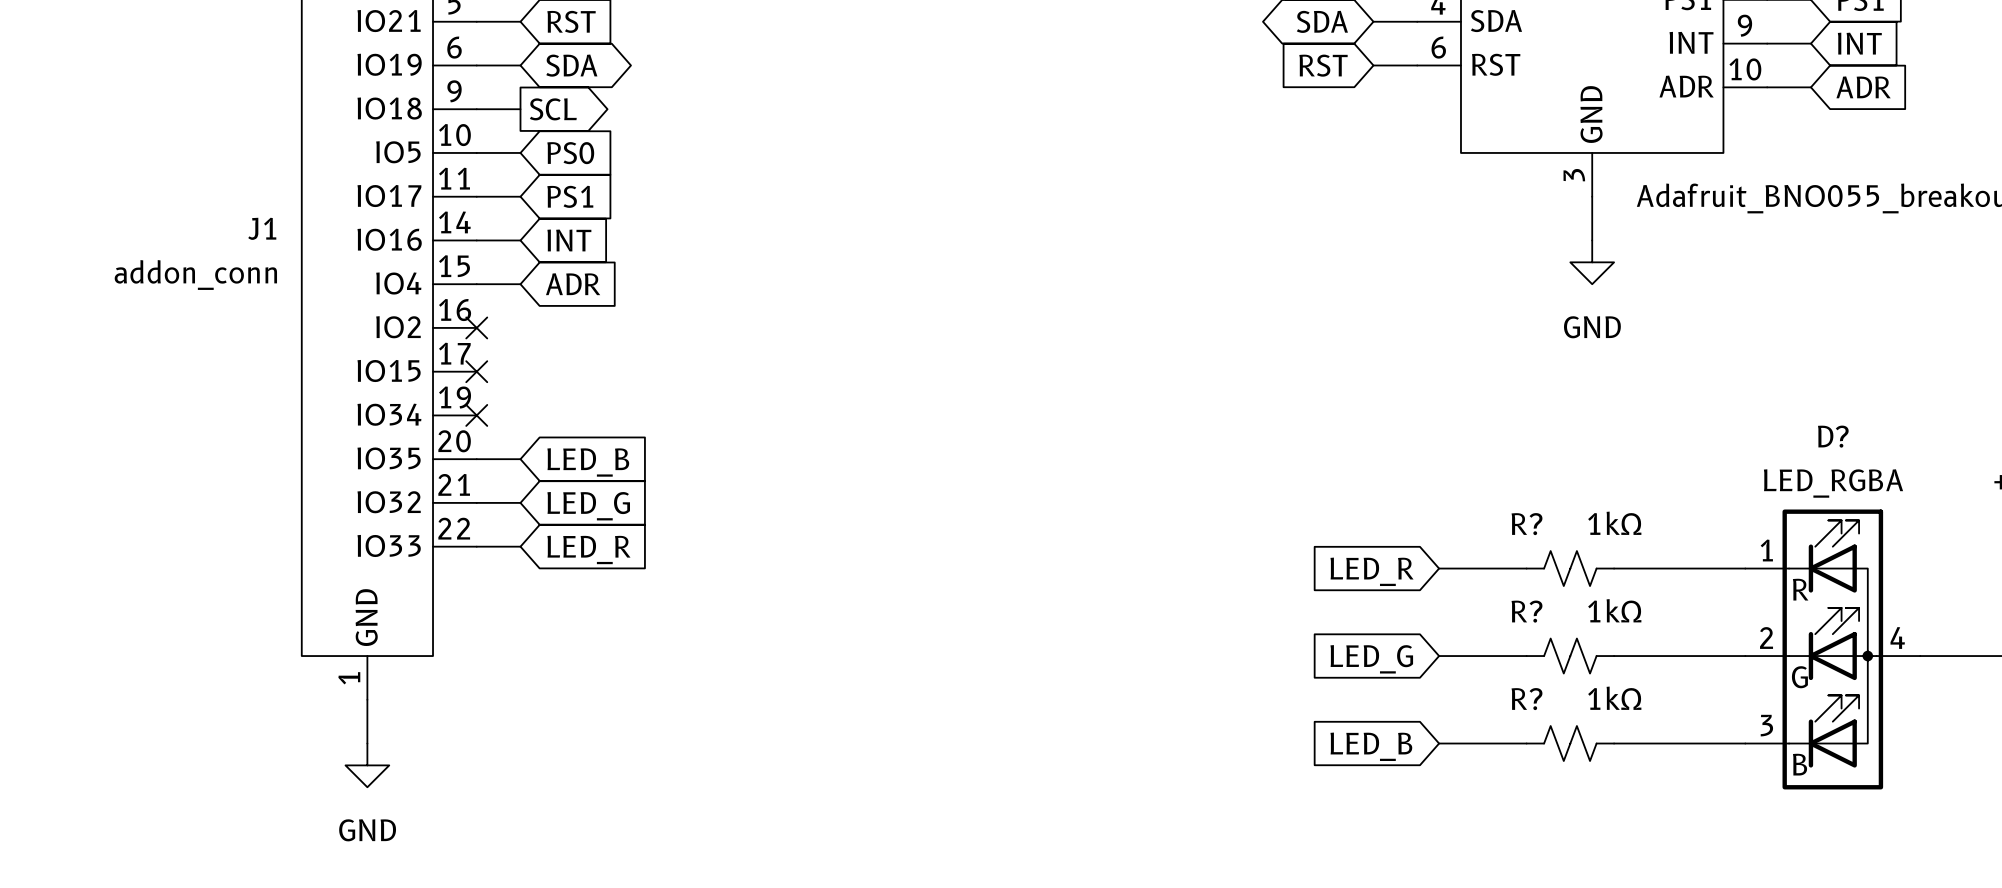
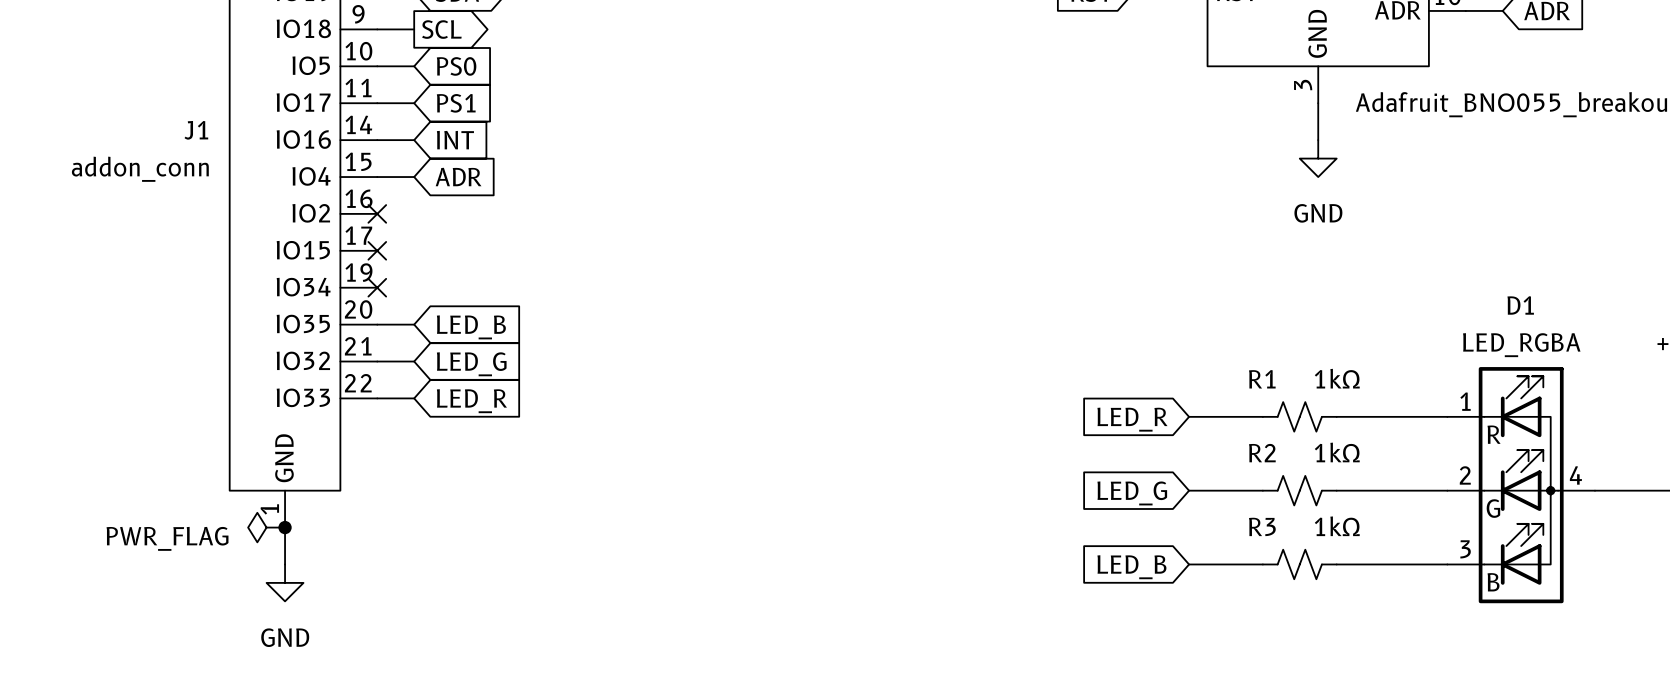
D? name: D? (1833, 436) -> D1 (1520, 305)
R? name: R? (1527, 524) -> R1 (1262, 379)
R? name: R? (1527, 611) -> R2 (1262, 453)
power symbol: none -> PWR_FLAG (266, 527)
junction: none -> (285, 527)
R? name: R? (1527, 699) -> R3 (1262, 526)

